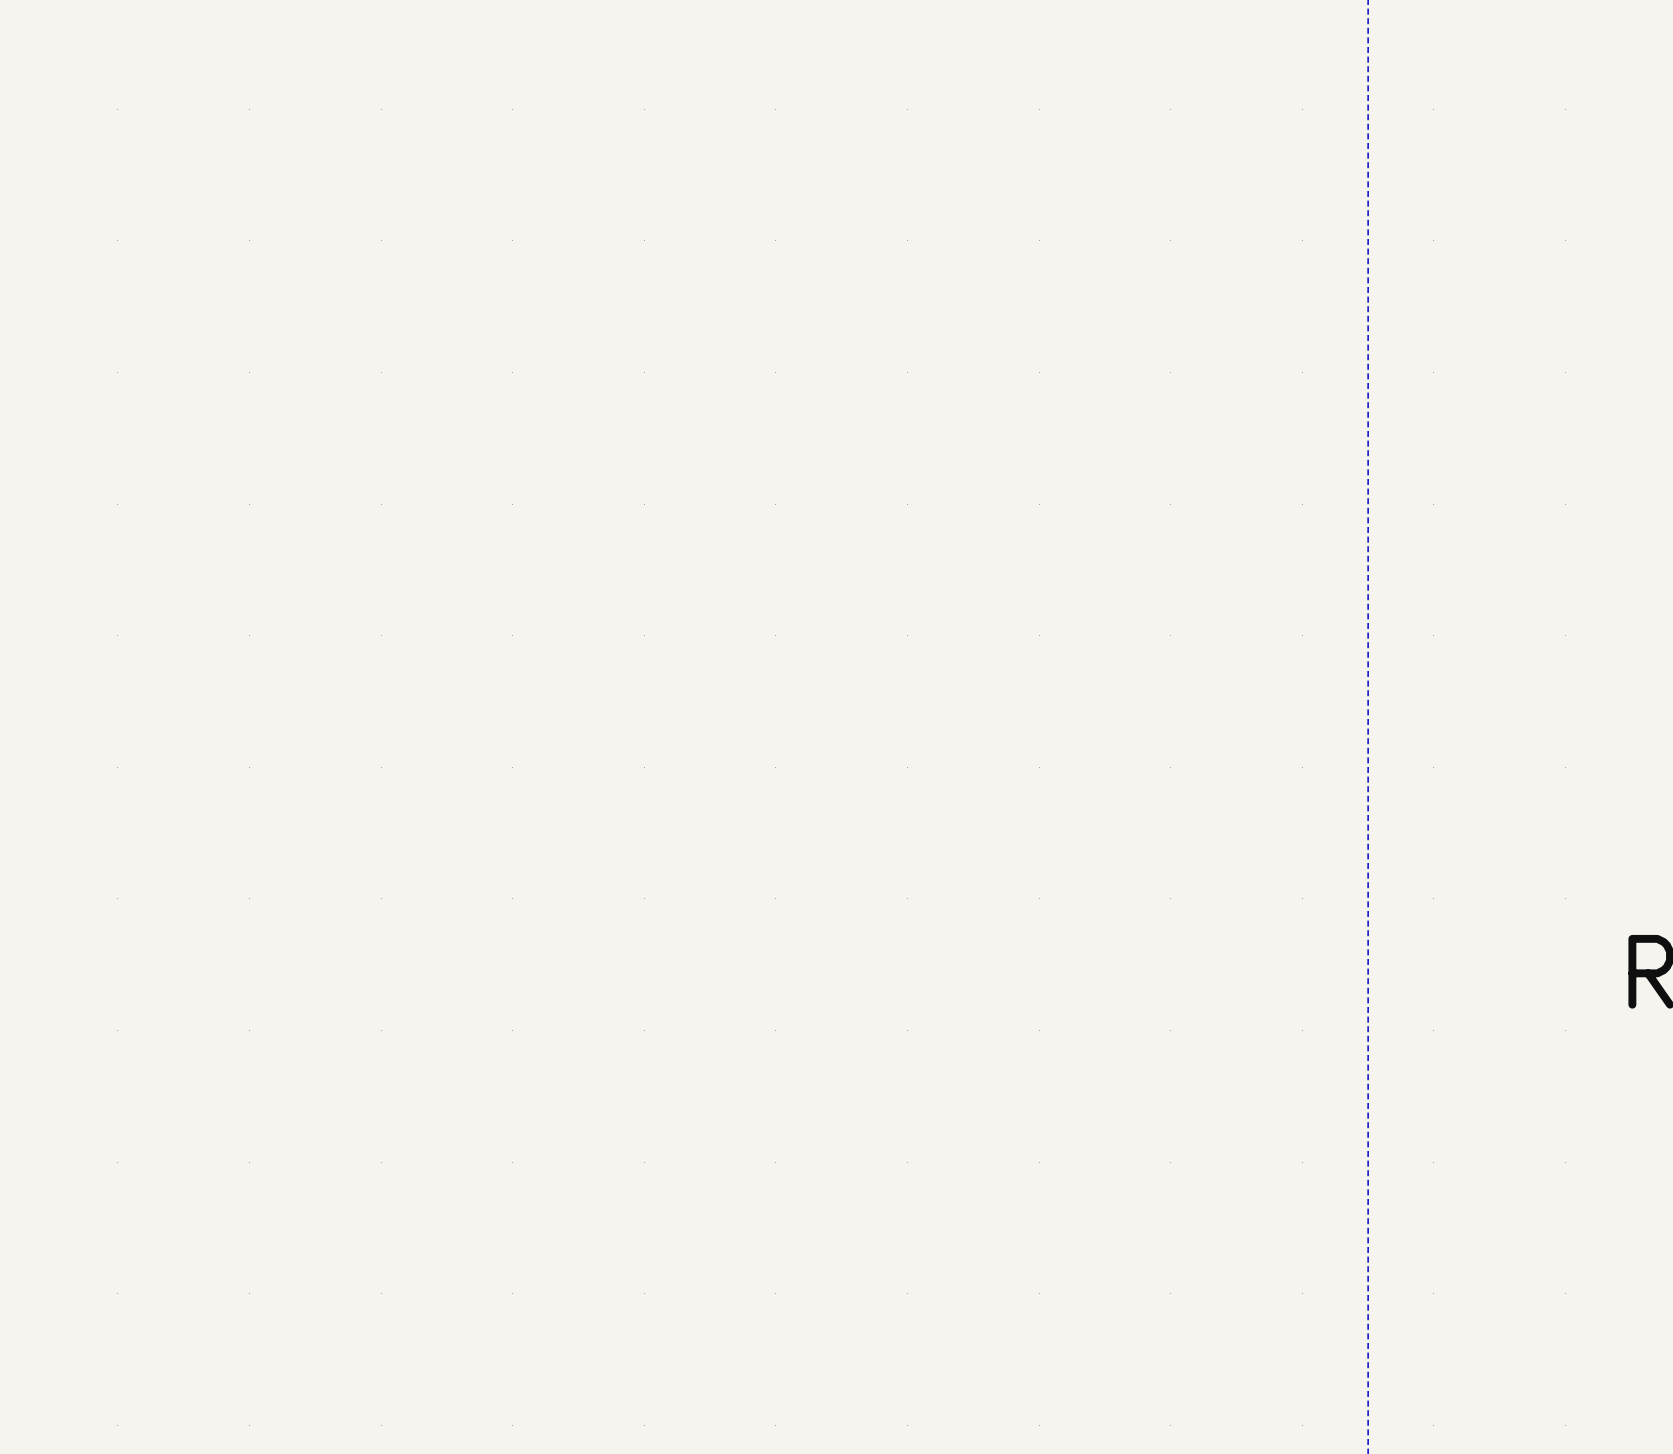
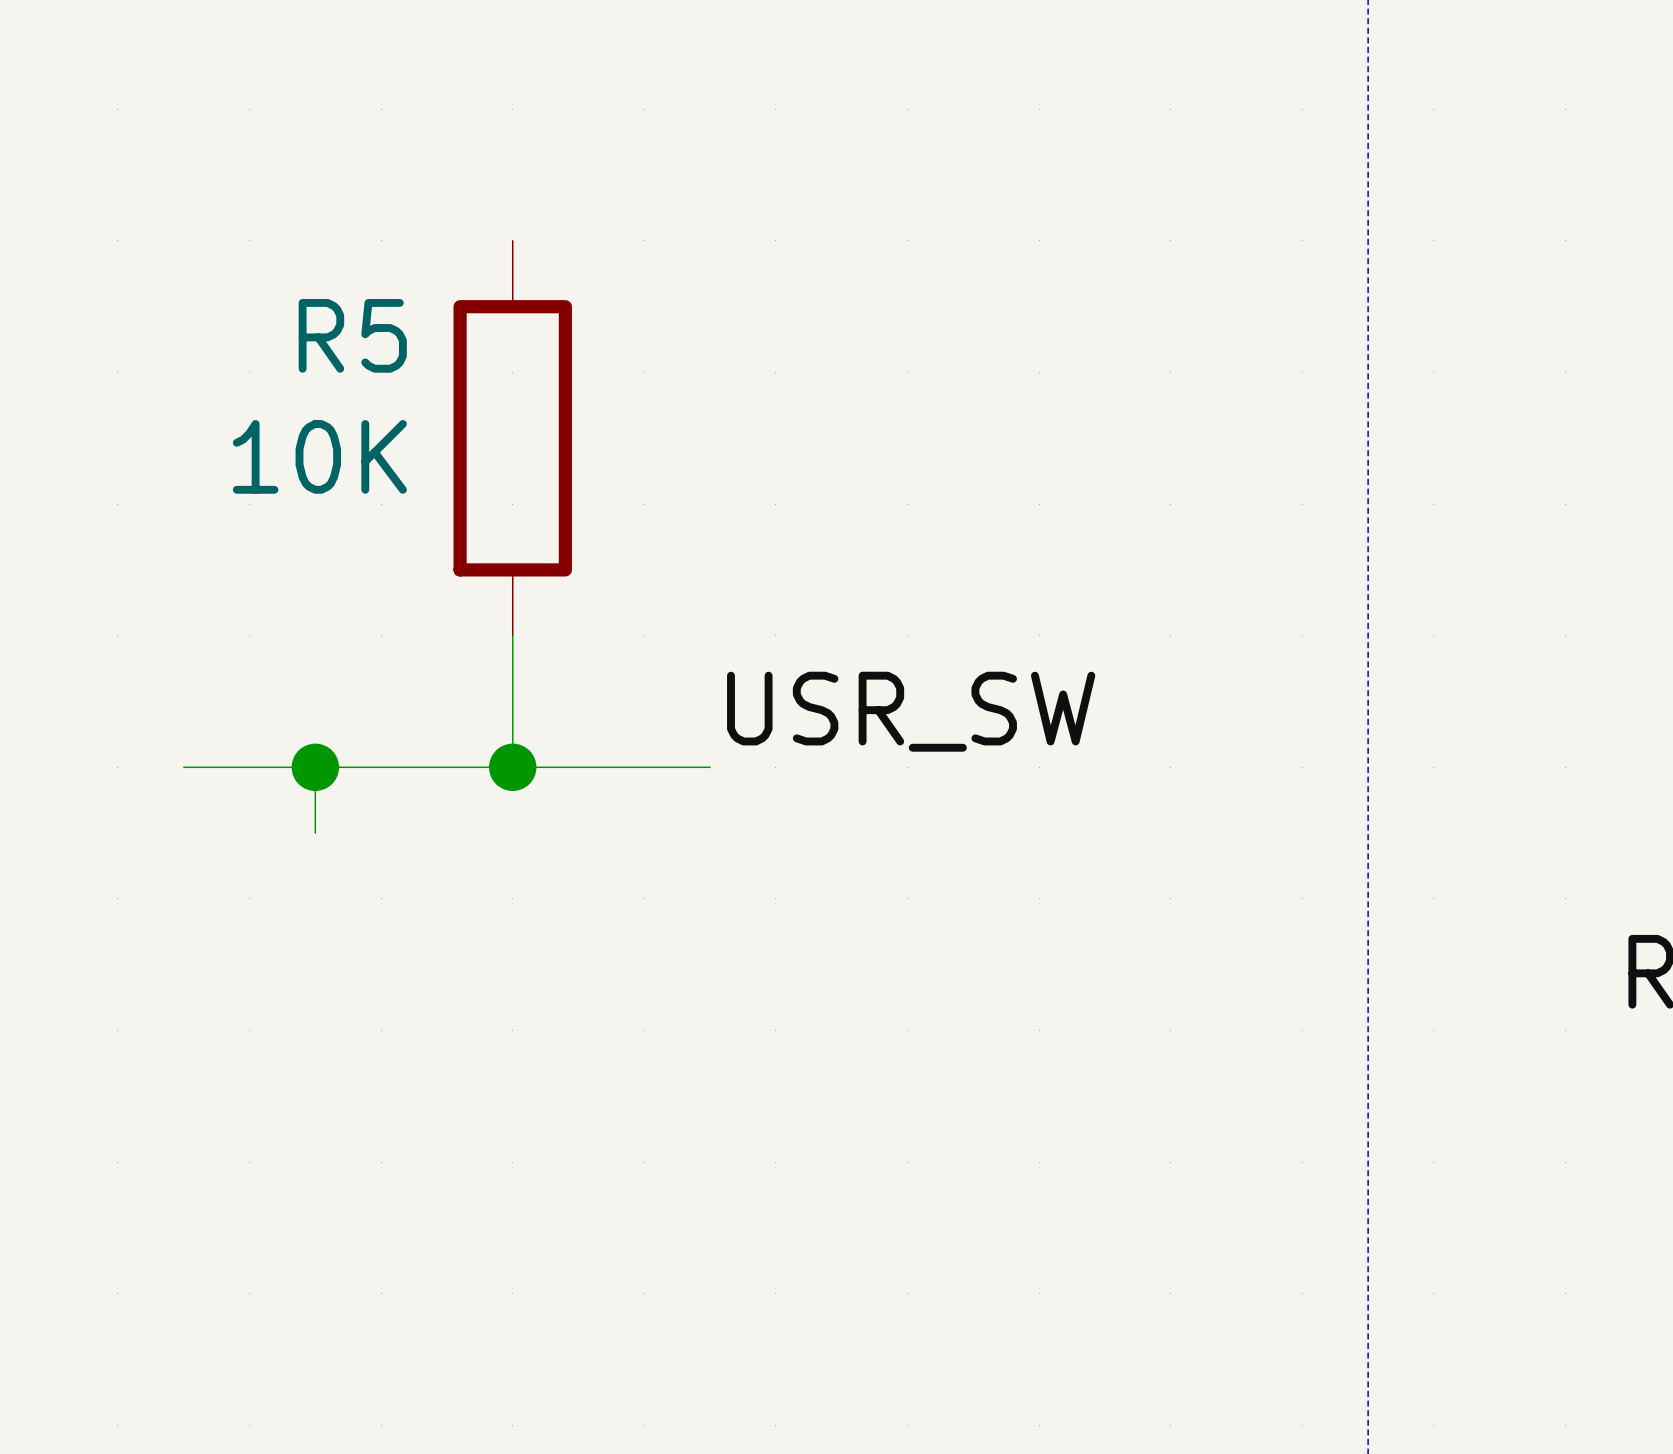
R5: none -> 10K (512, 438)
wire: none -> (512, 635) (512, 767)
label: none -> USR_SW (911, 711)
wire: none -> (183, 767) (710, 767)
wire: none -> (315, 767) (315, 833)
junction: none -> (315, 767)
junction: none -> (512, 767)

